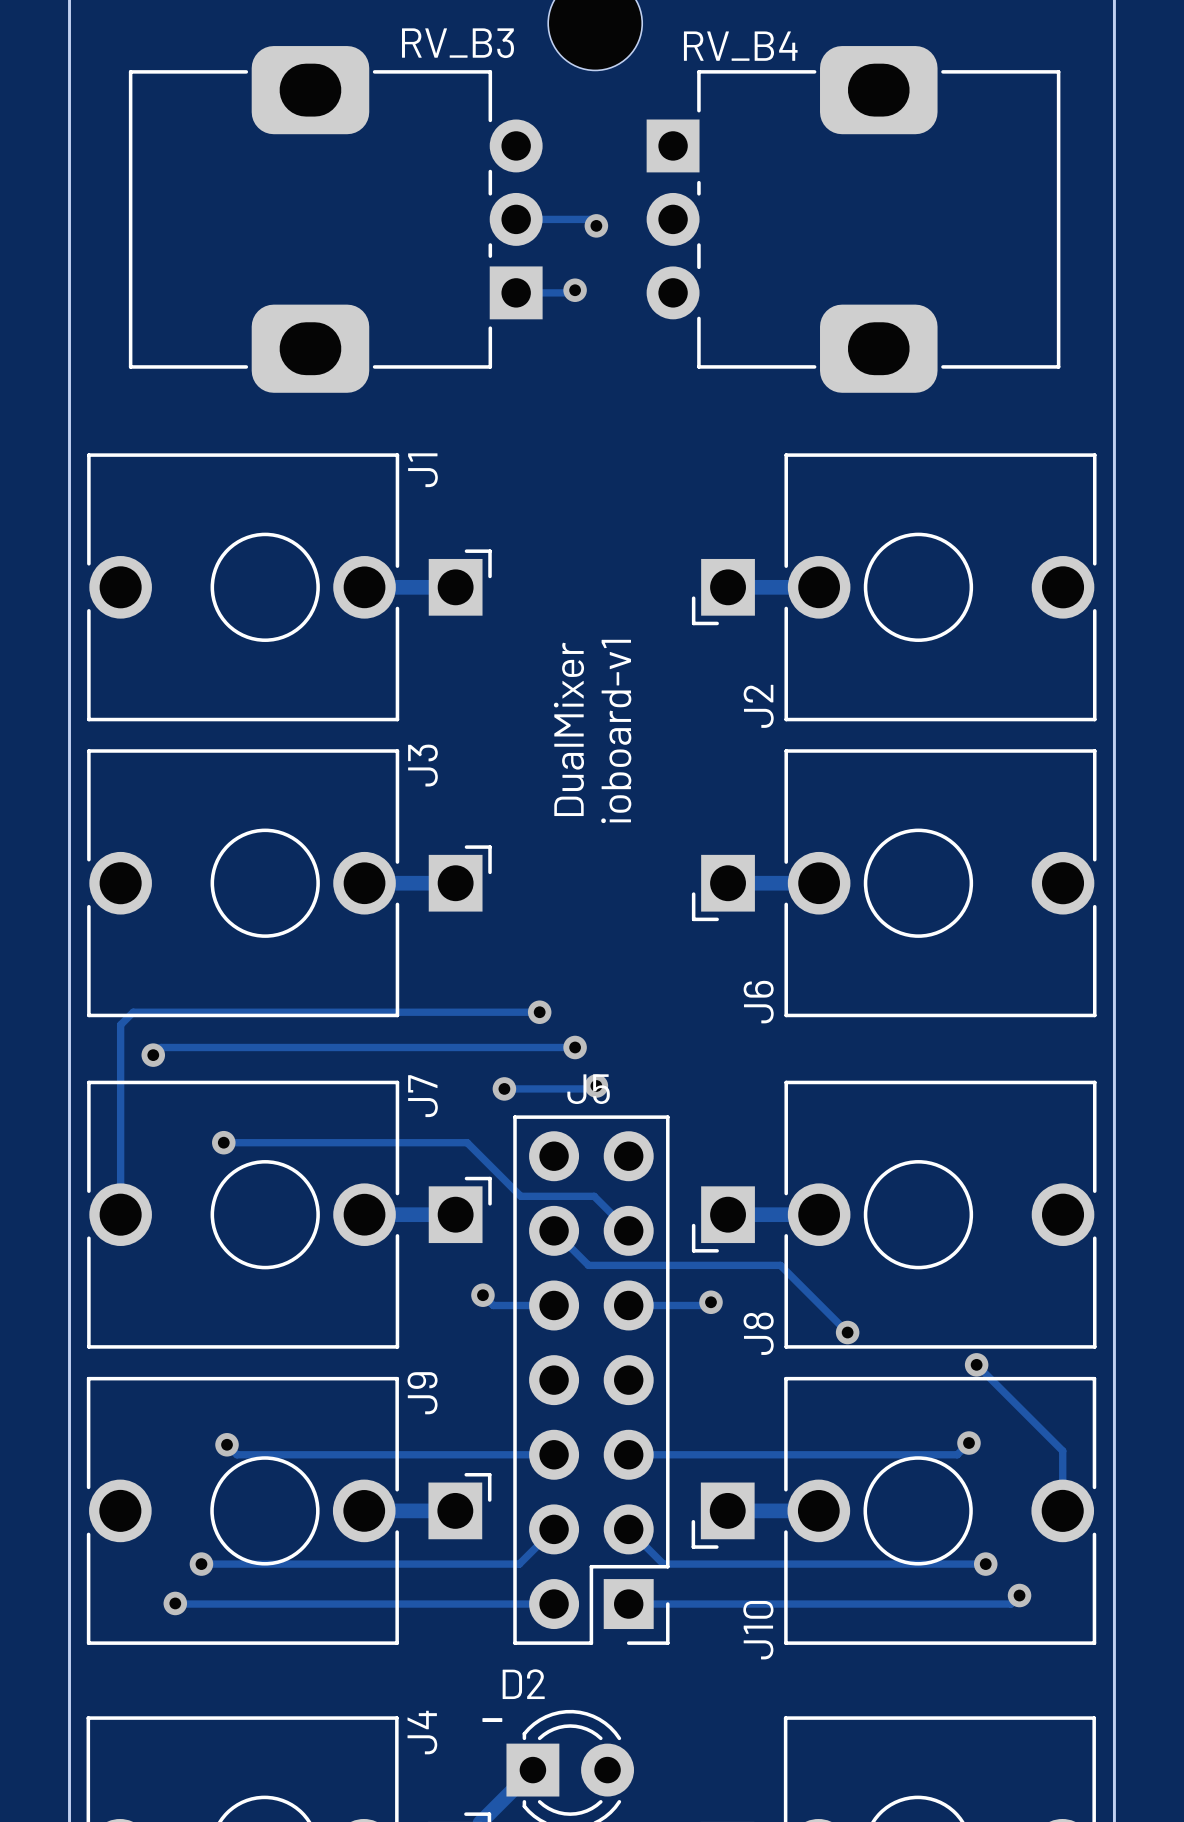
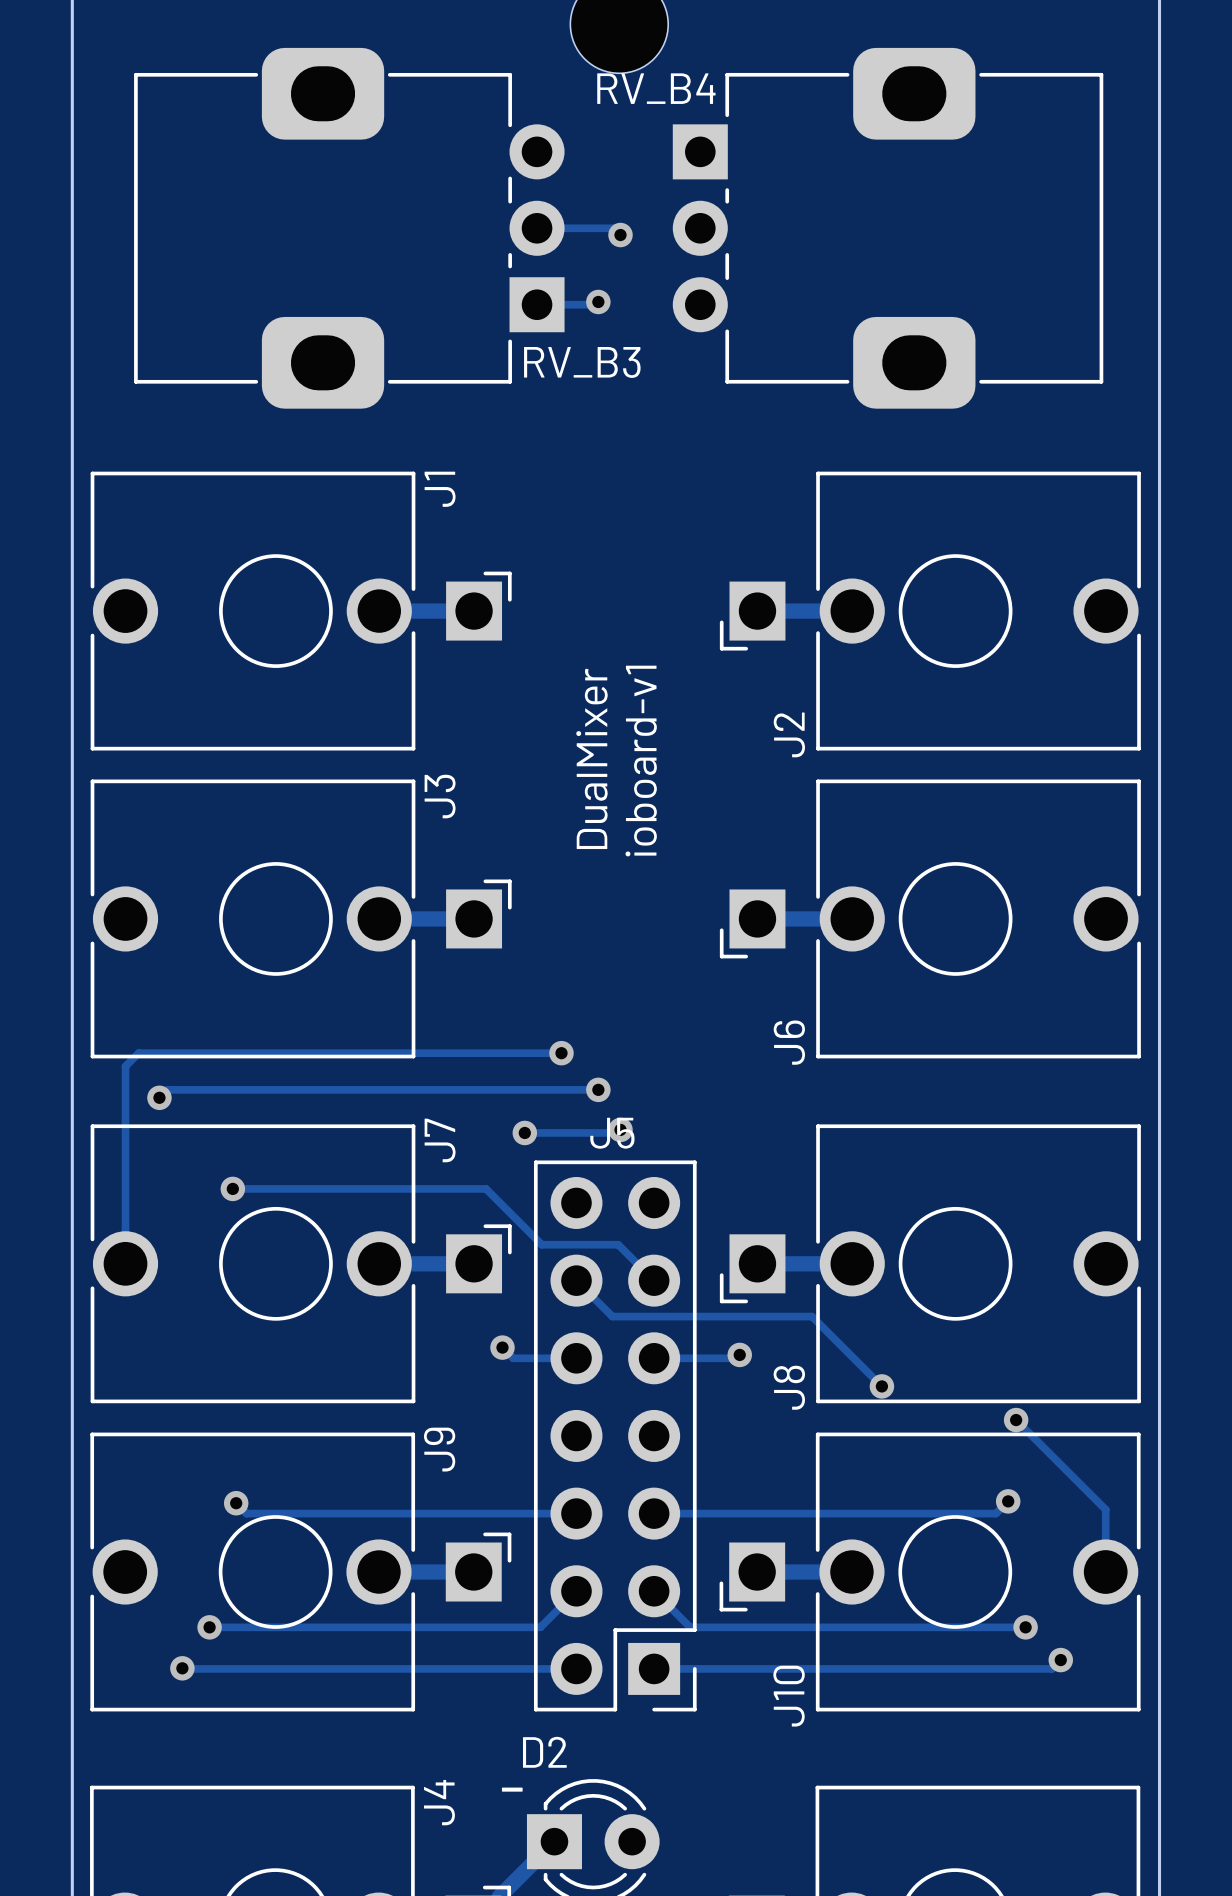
RV_B3 name position: RV_B3 (458, 43) -> RV_B3 (582, 362)
RV_B4 name position: RV_B4 (740, 46) -> RV_B4 (656, 88)

